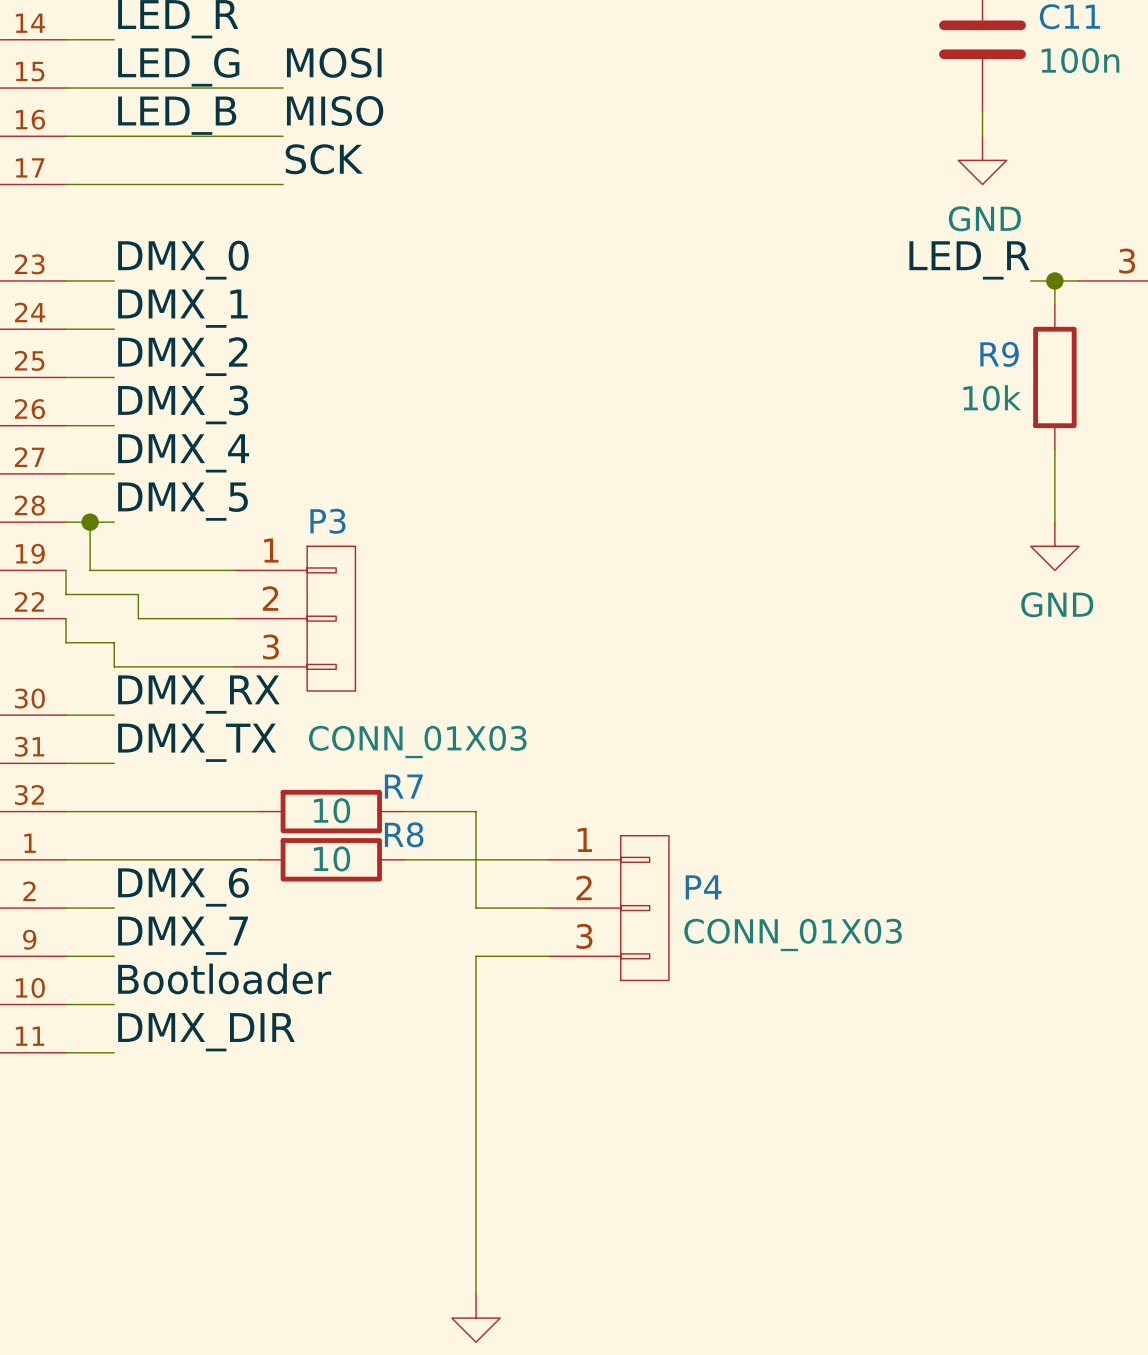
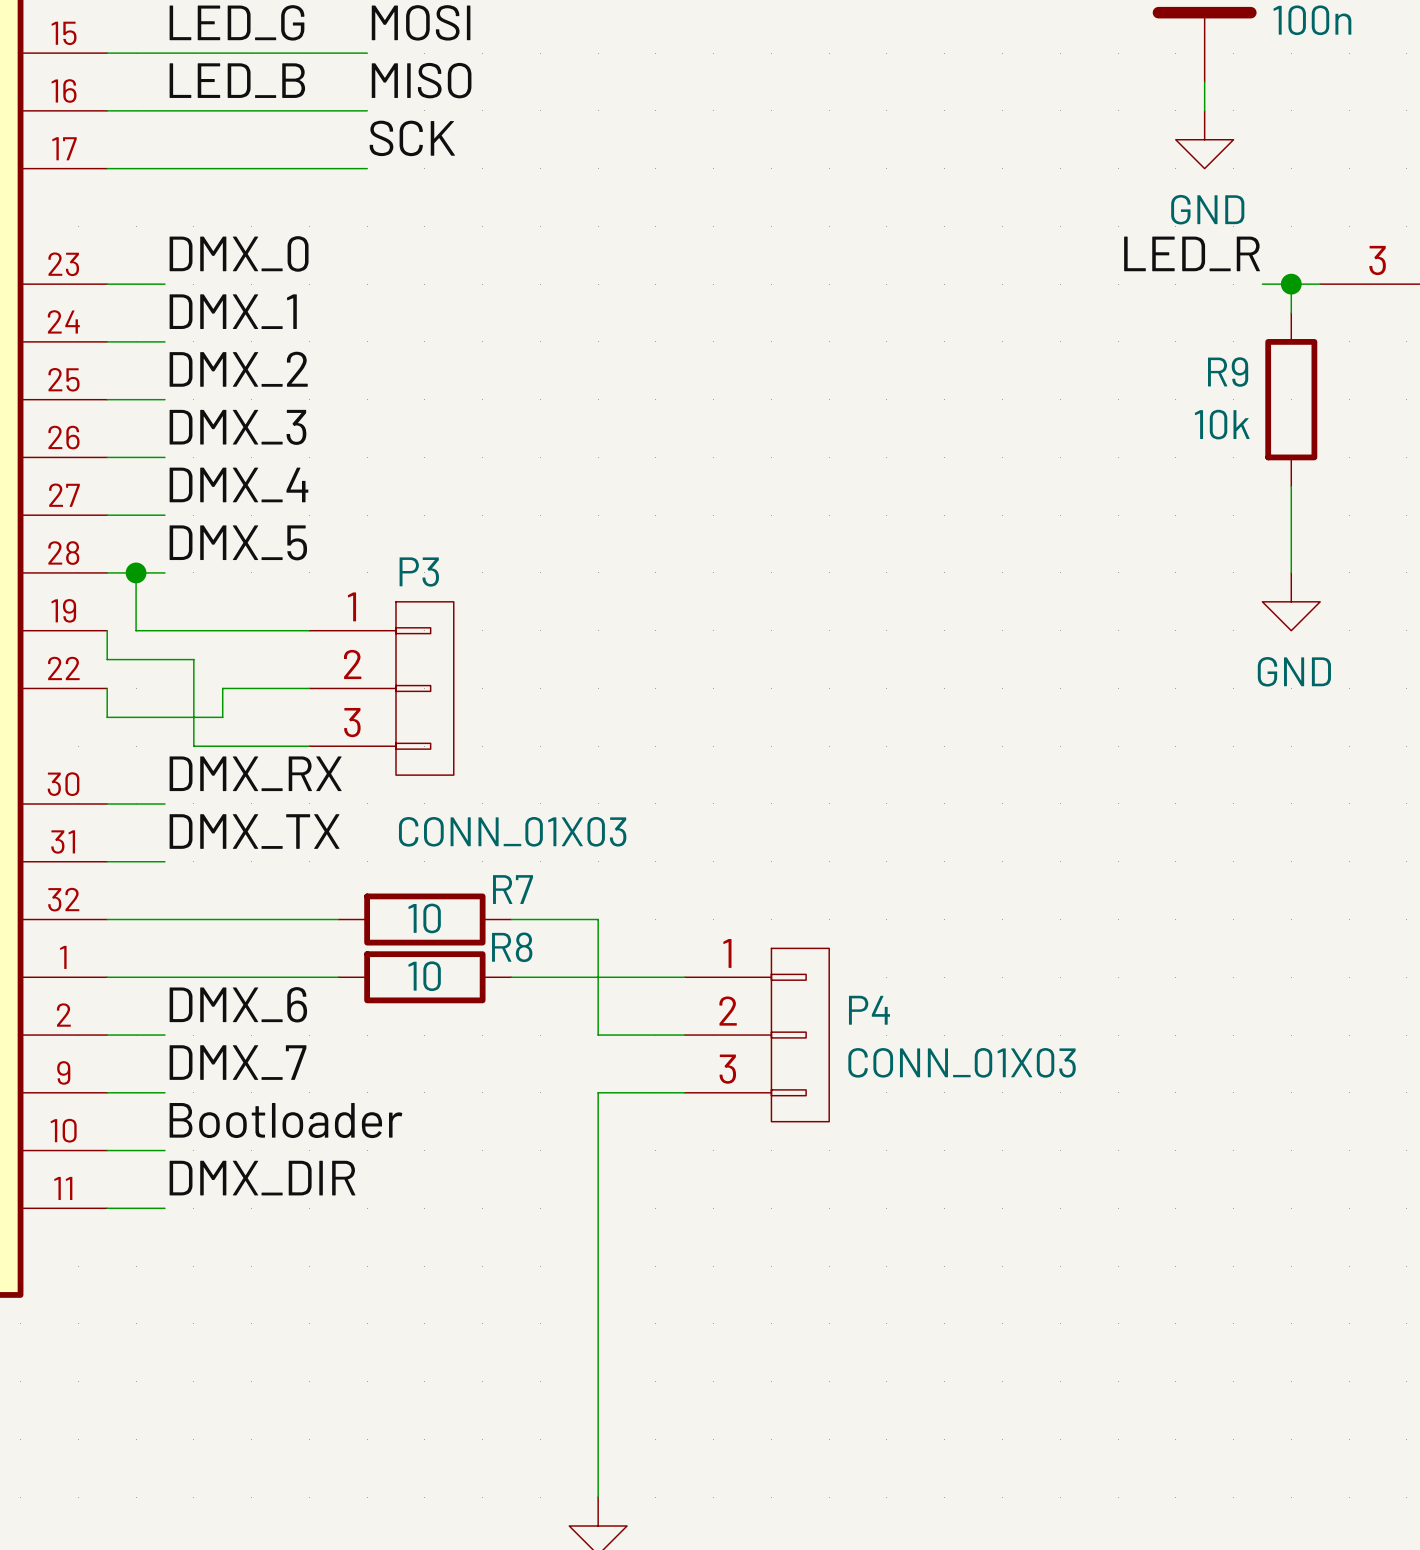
wire: (138, 618) (162, 618) -> (164, 717) (222, 717) (222, 688)
wire: (114, 642) (114, 666) (138, 666) -> (193, 688) (193, 746)

